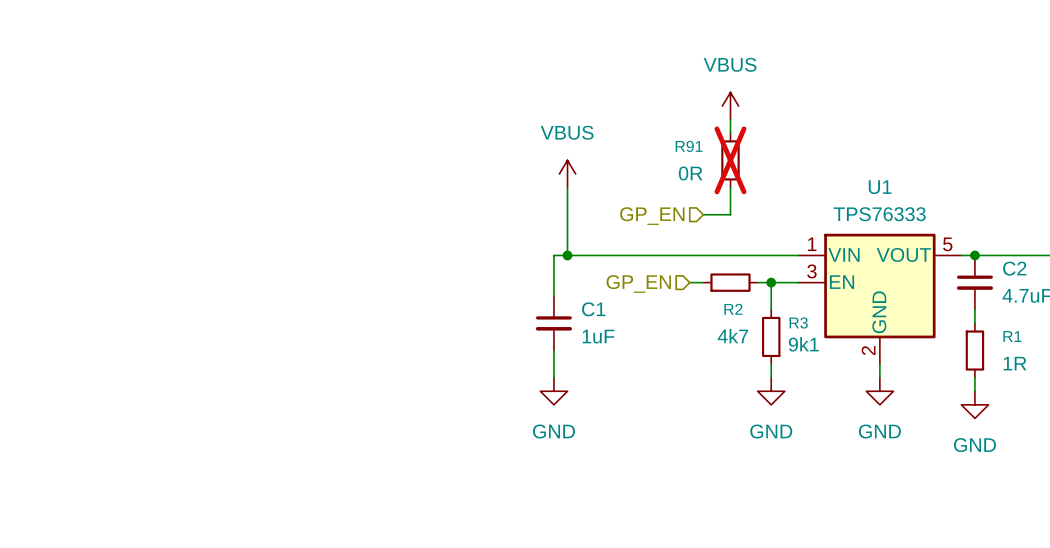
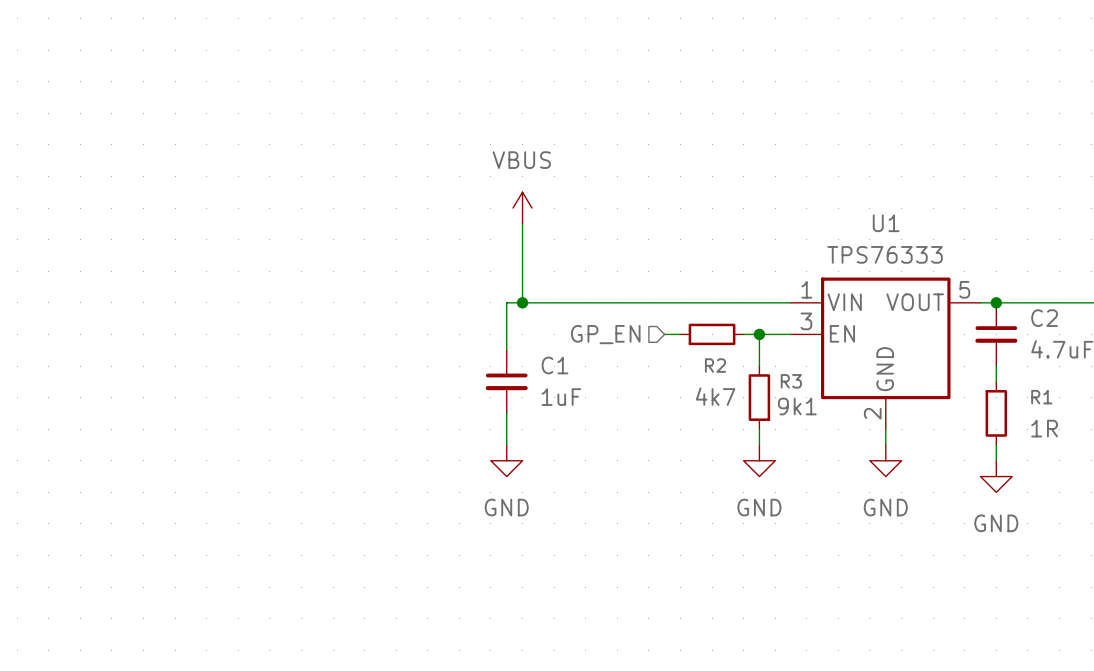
power symbol: VBUS (730, 106) -> none
wire: (730, 119) (730, 133) -> none
R91: 0R (730, 160) -> none
wire: (730, 187) (730, 214) (703, 214) -> none
hierarchical label: GP_EN (652, 216) -> none

